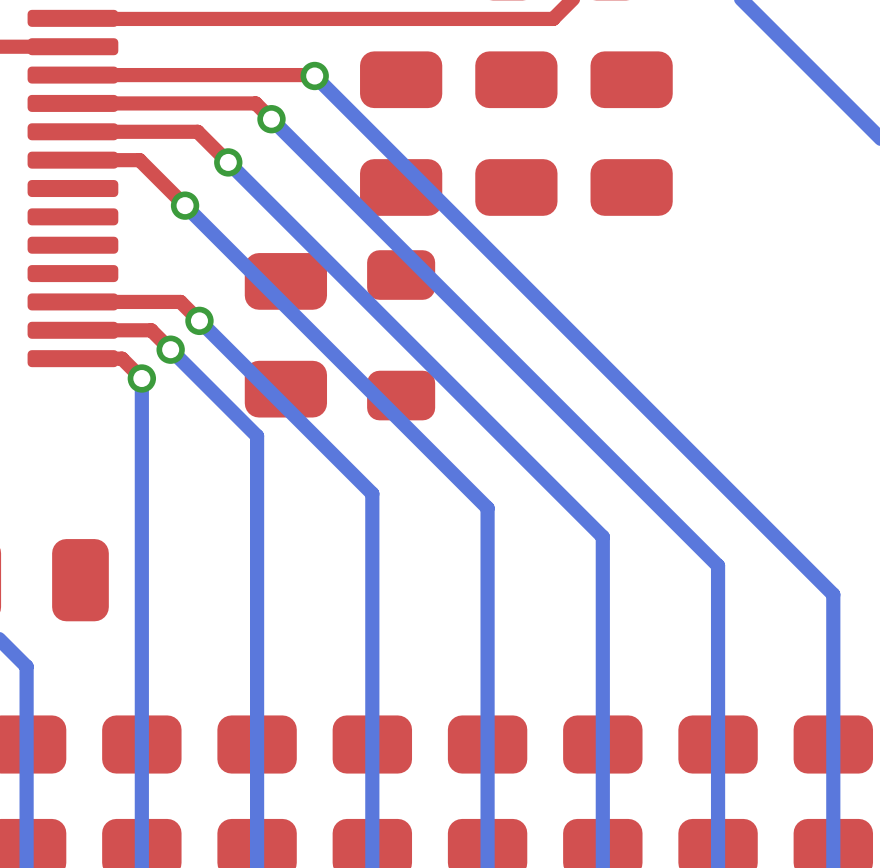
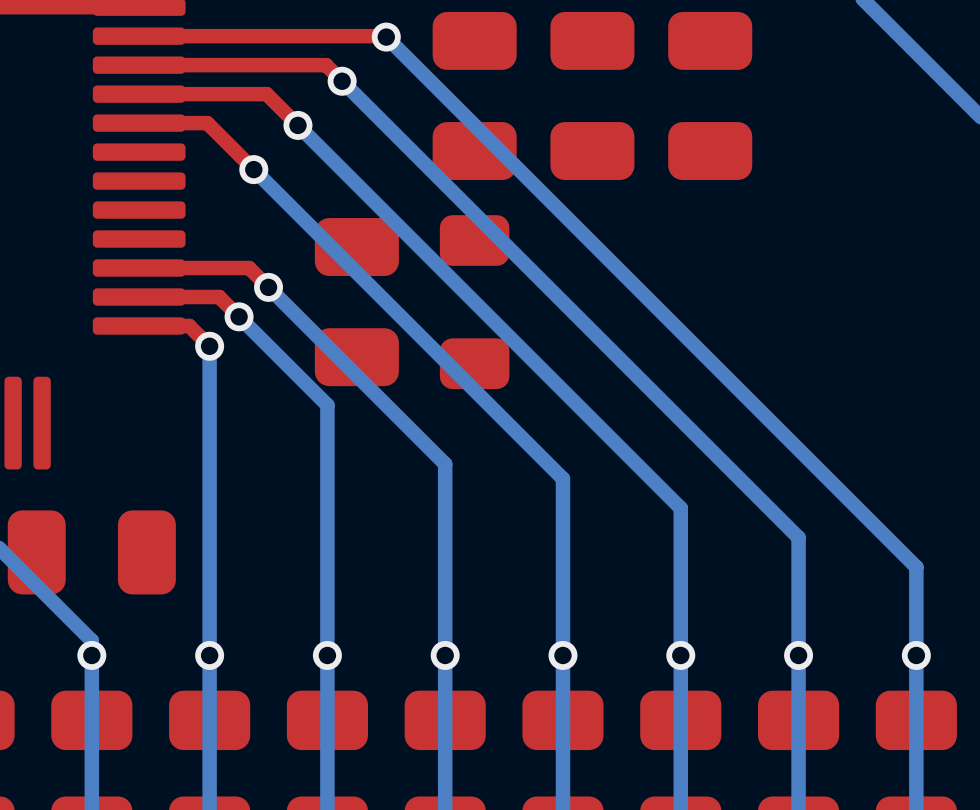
via: none -> (91, 655)
via: none -> (209, 655)
via: none -> (327, 655)
via: none -> (445, 655)
via: none -> (562, 655)
via: none -> (680, 655)
via: none -> (798, 655)
via: none -> (916, 655)

